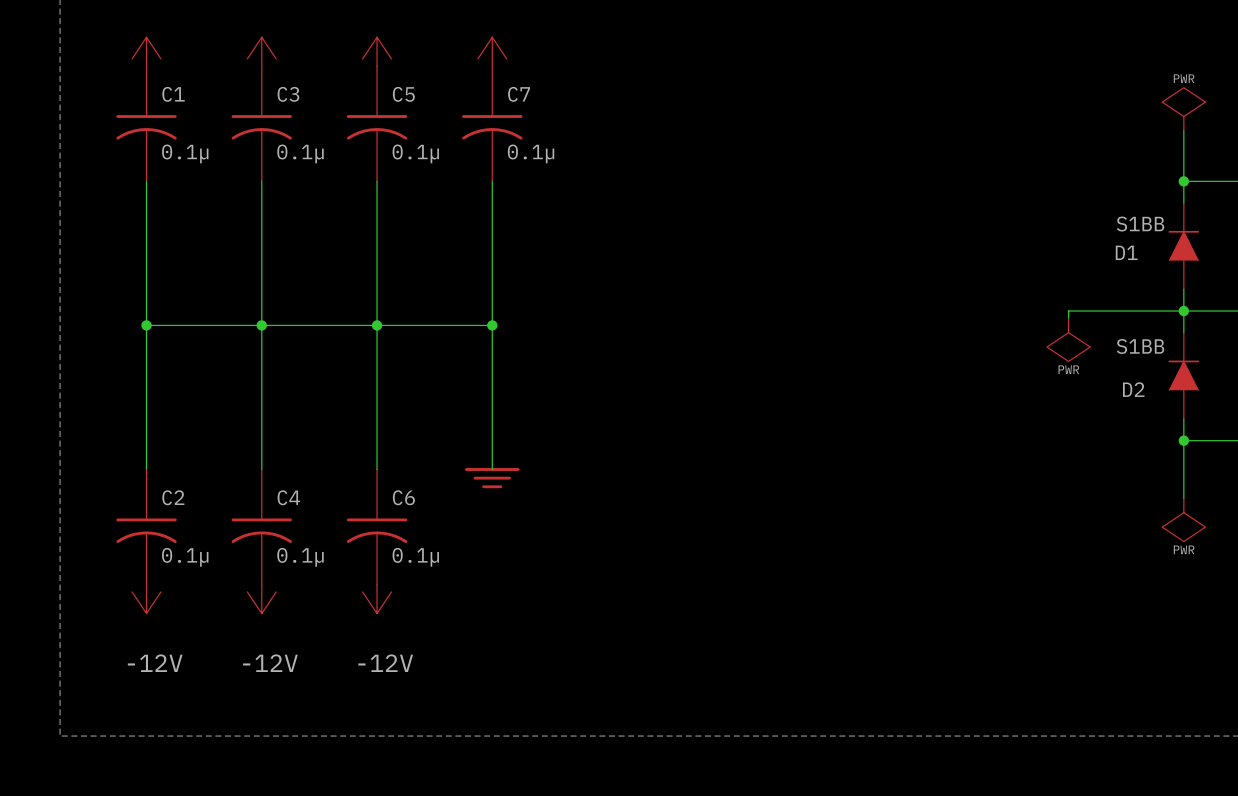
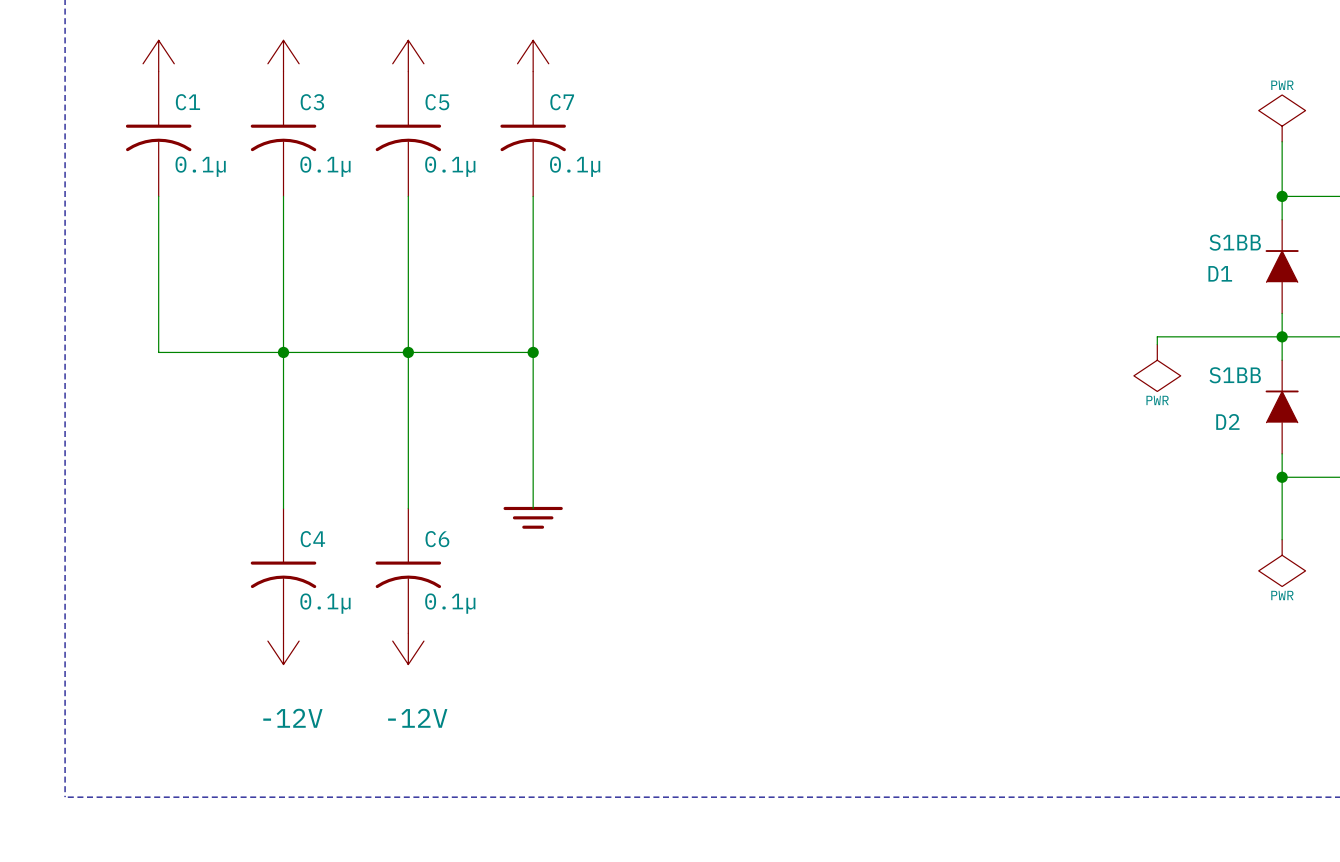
wire: (146, 325) (146, 469) -> none
junction: (146, 325) -> none
C2: 0.1µ (146, 527) -> none
power symbol: -12V (146, 599) -> none

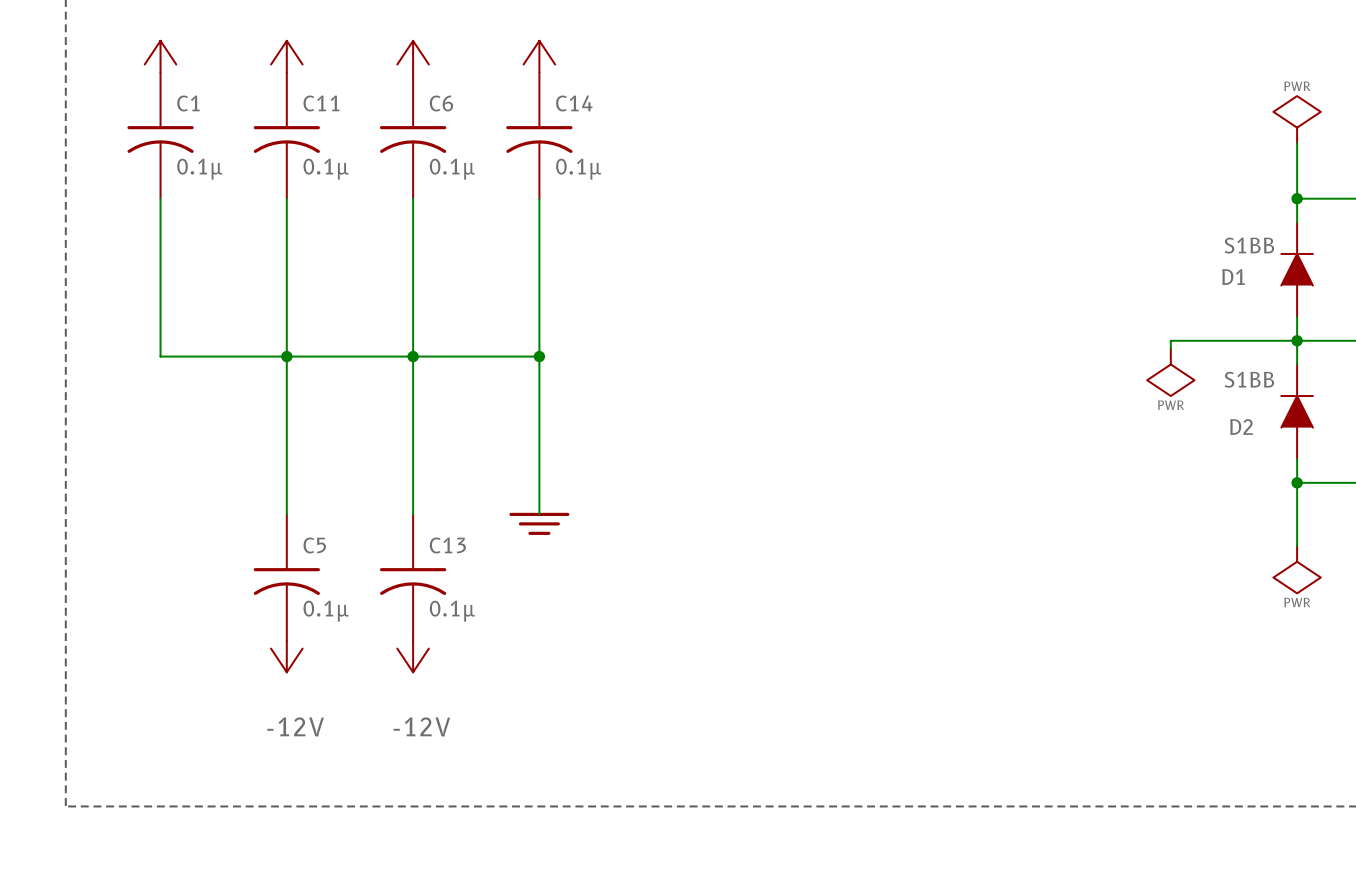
C3 name: C3 (312, 102) -> C11 (321, 103)
C5 name: C5 (437, 102) -> C6 (441, 103)
C7 name: C7 (562, 102) -> C14 (574, 103)
C4 name: C4 (312, 539) -> C5 (314, 545)
C6 name: C6 (437, 539) -> C13 (447, 545)

